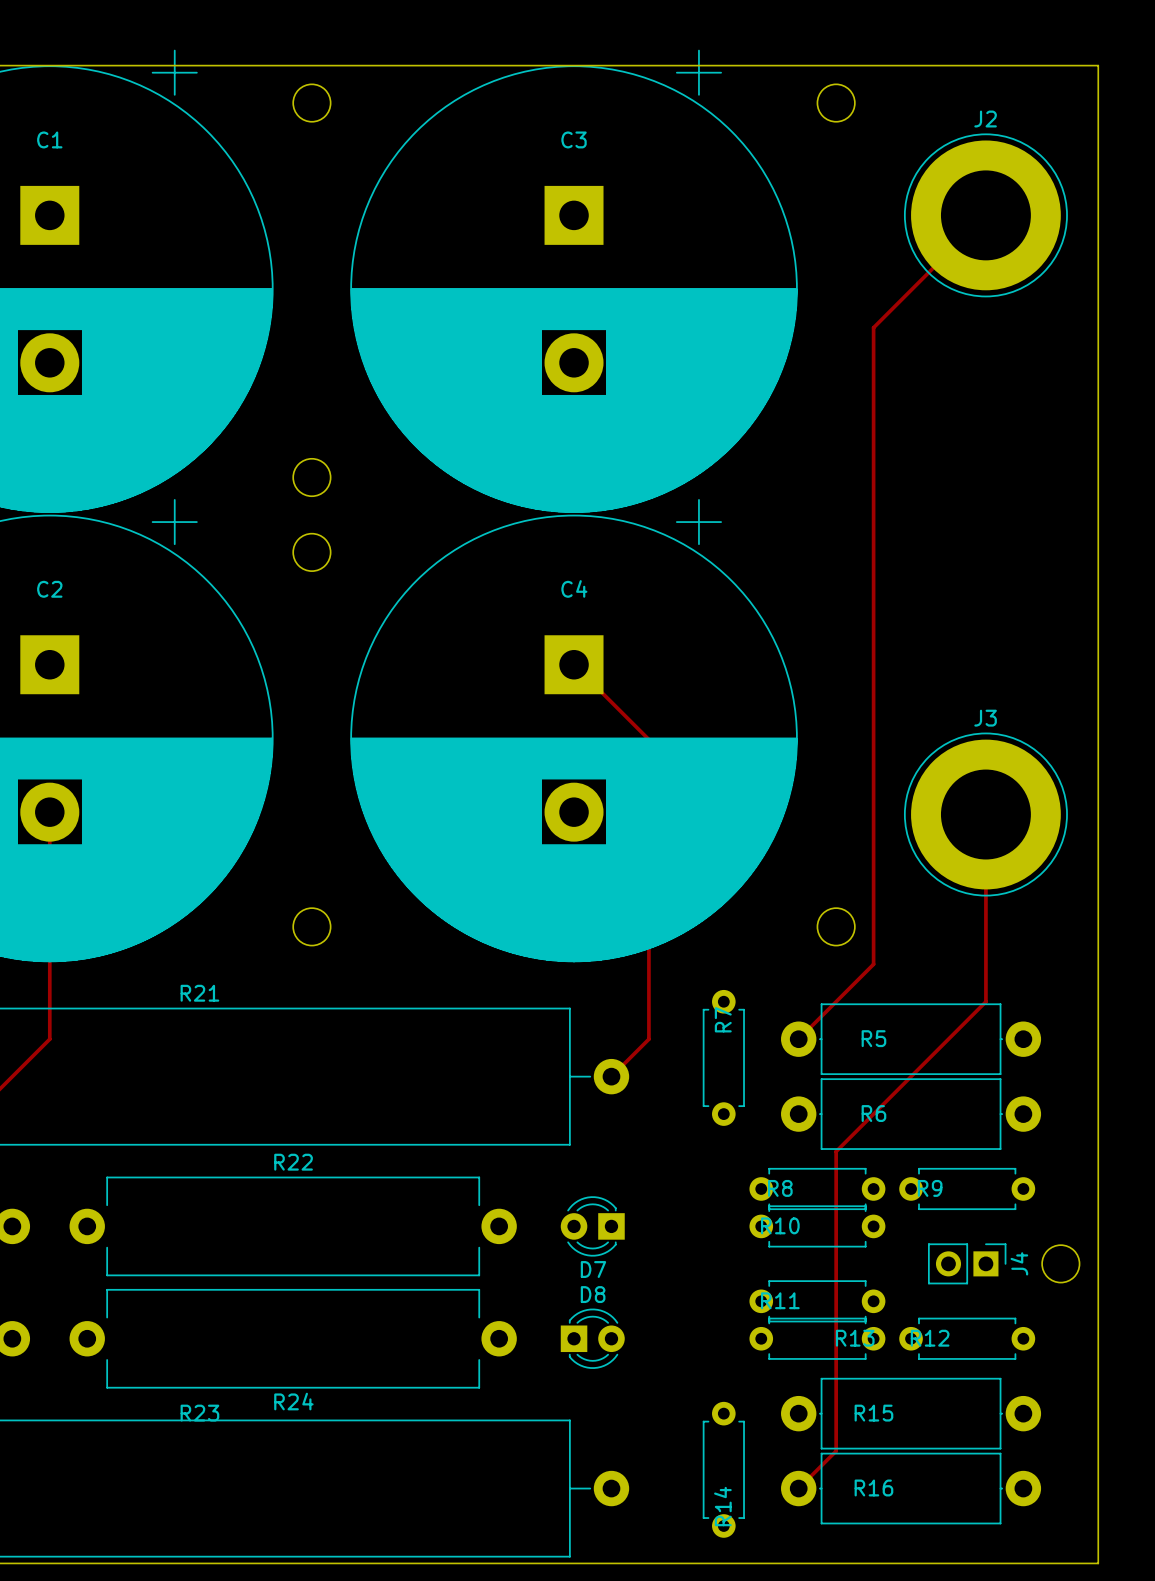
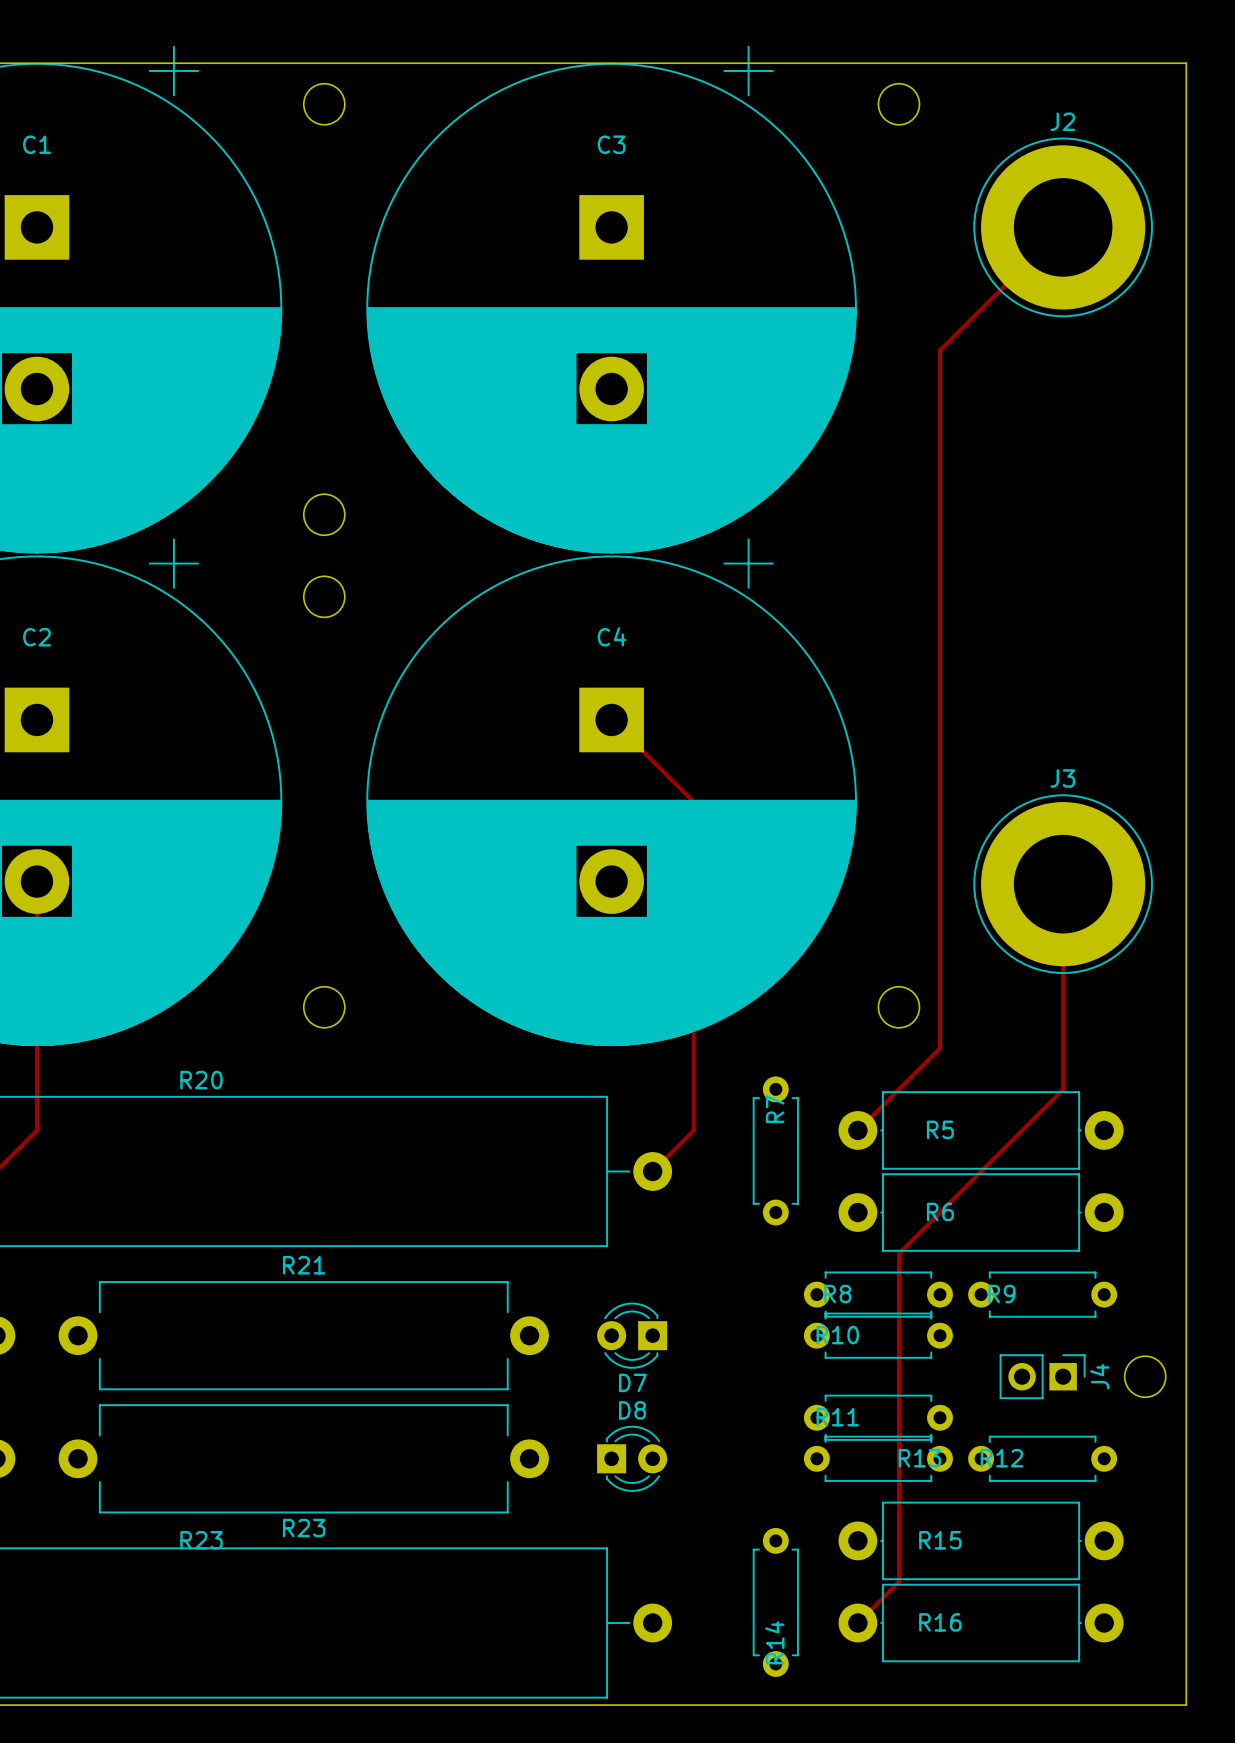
R21 name: R21 (199, 993) -> R20 (201, 1080)
R22 name: R22 (293, 1162) -> R21 (304, 1265)
R24 name: R24 (293, 1401) -> R23 (304, 1528)

